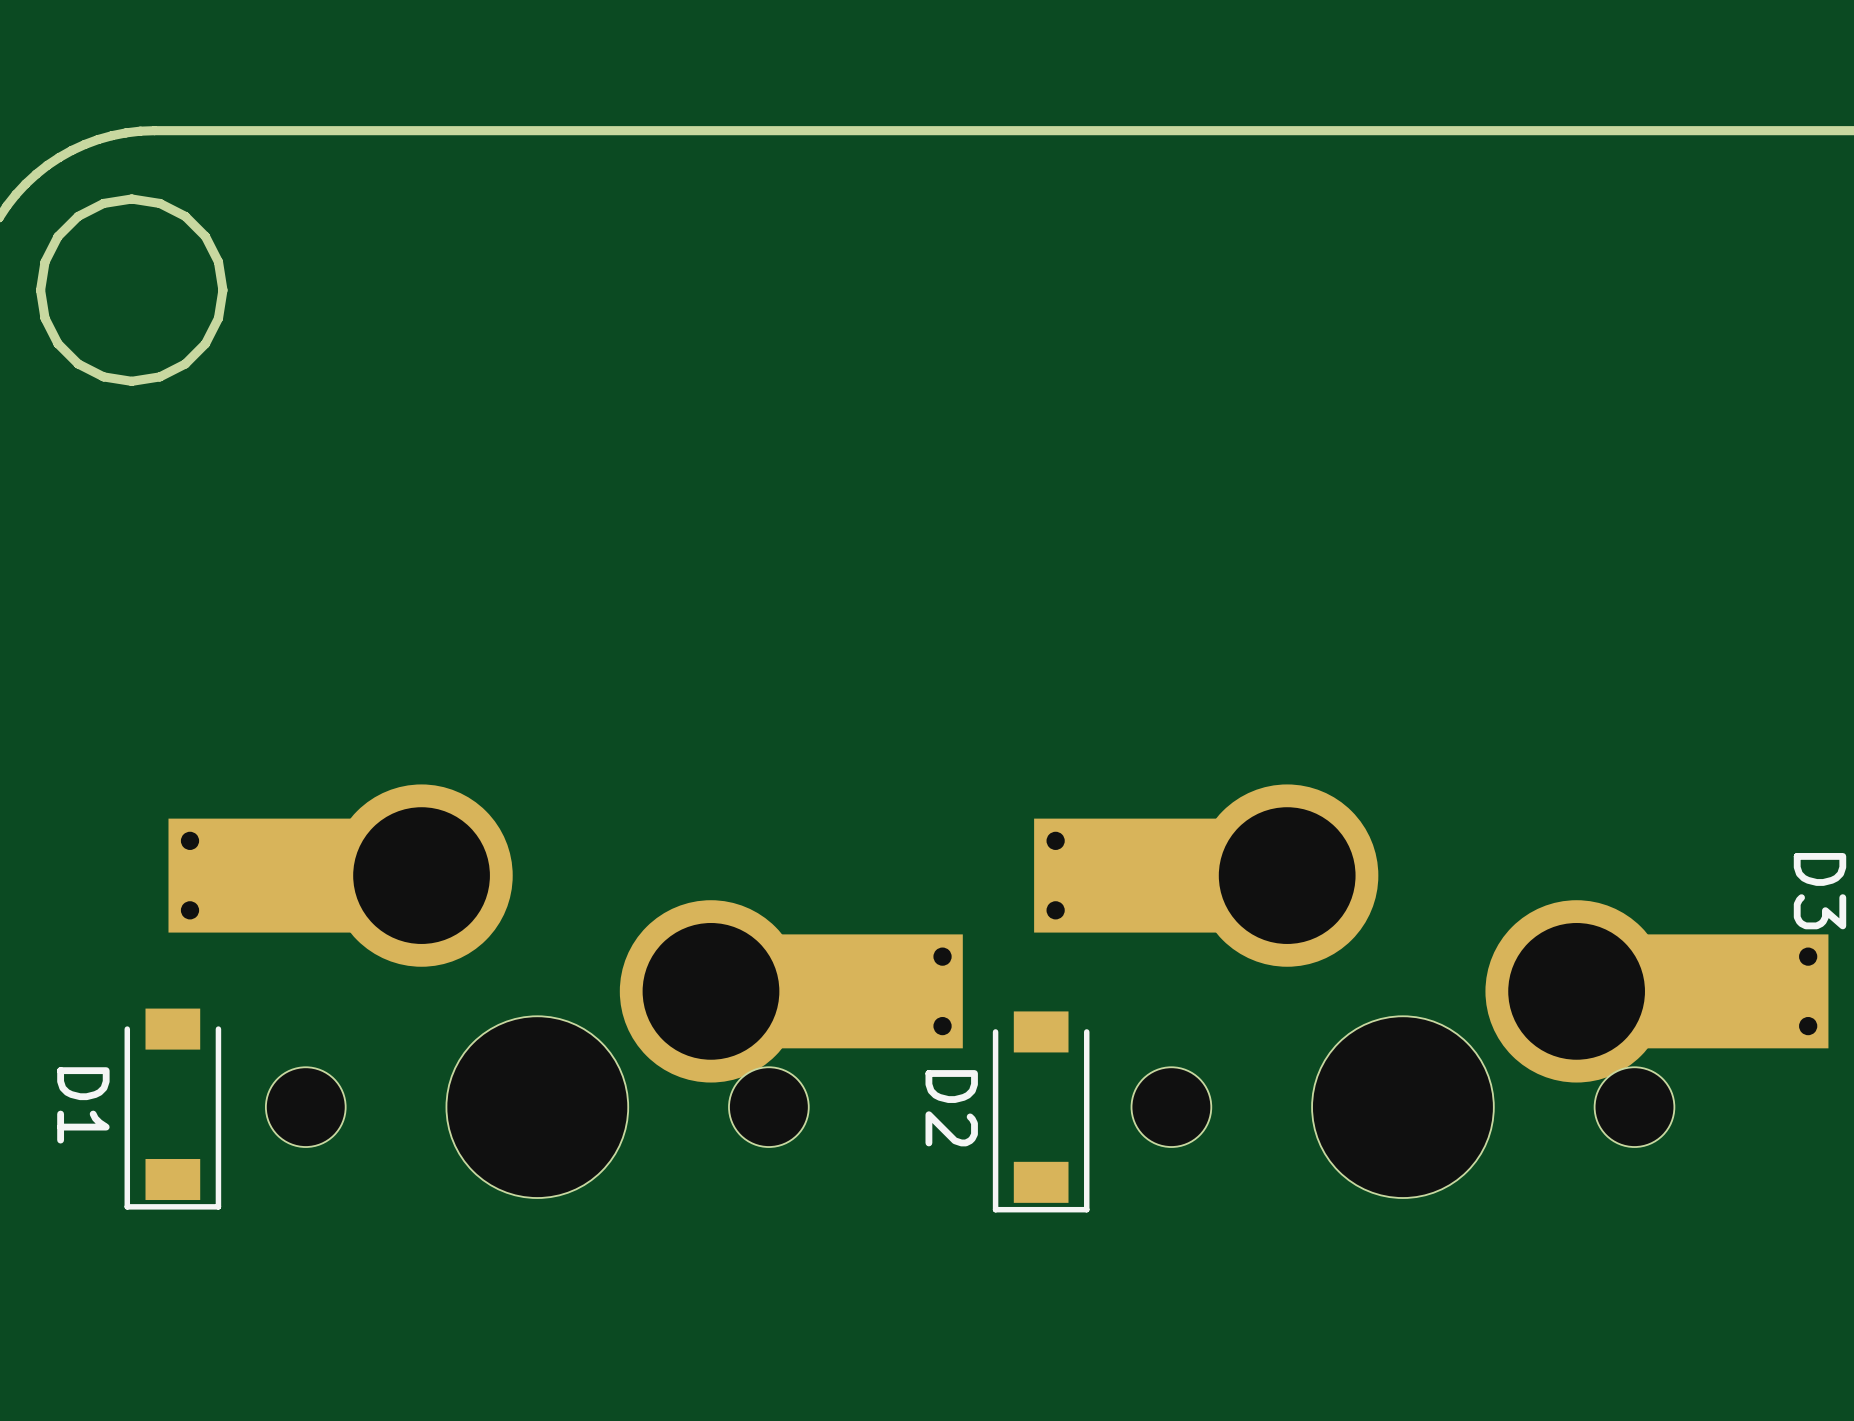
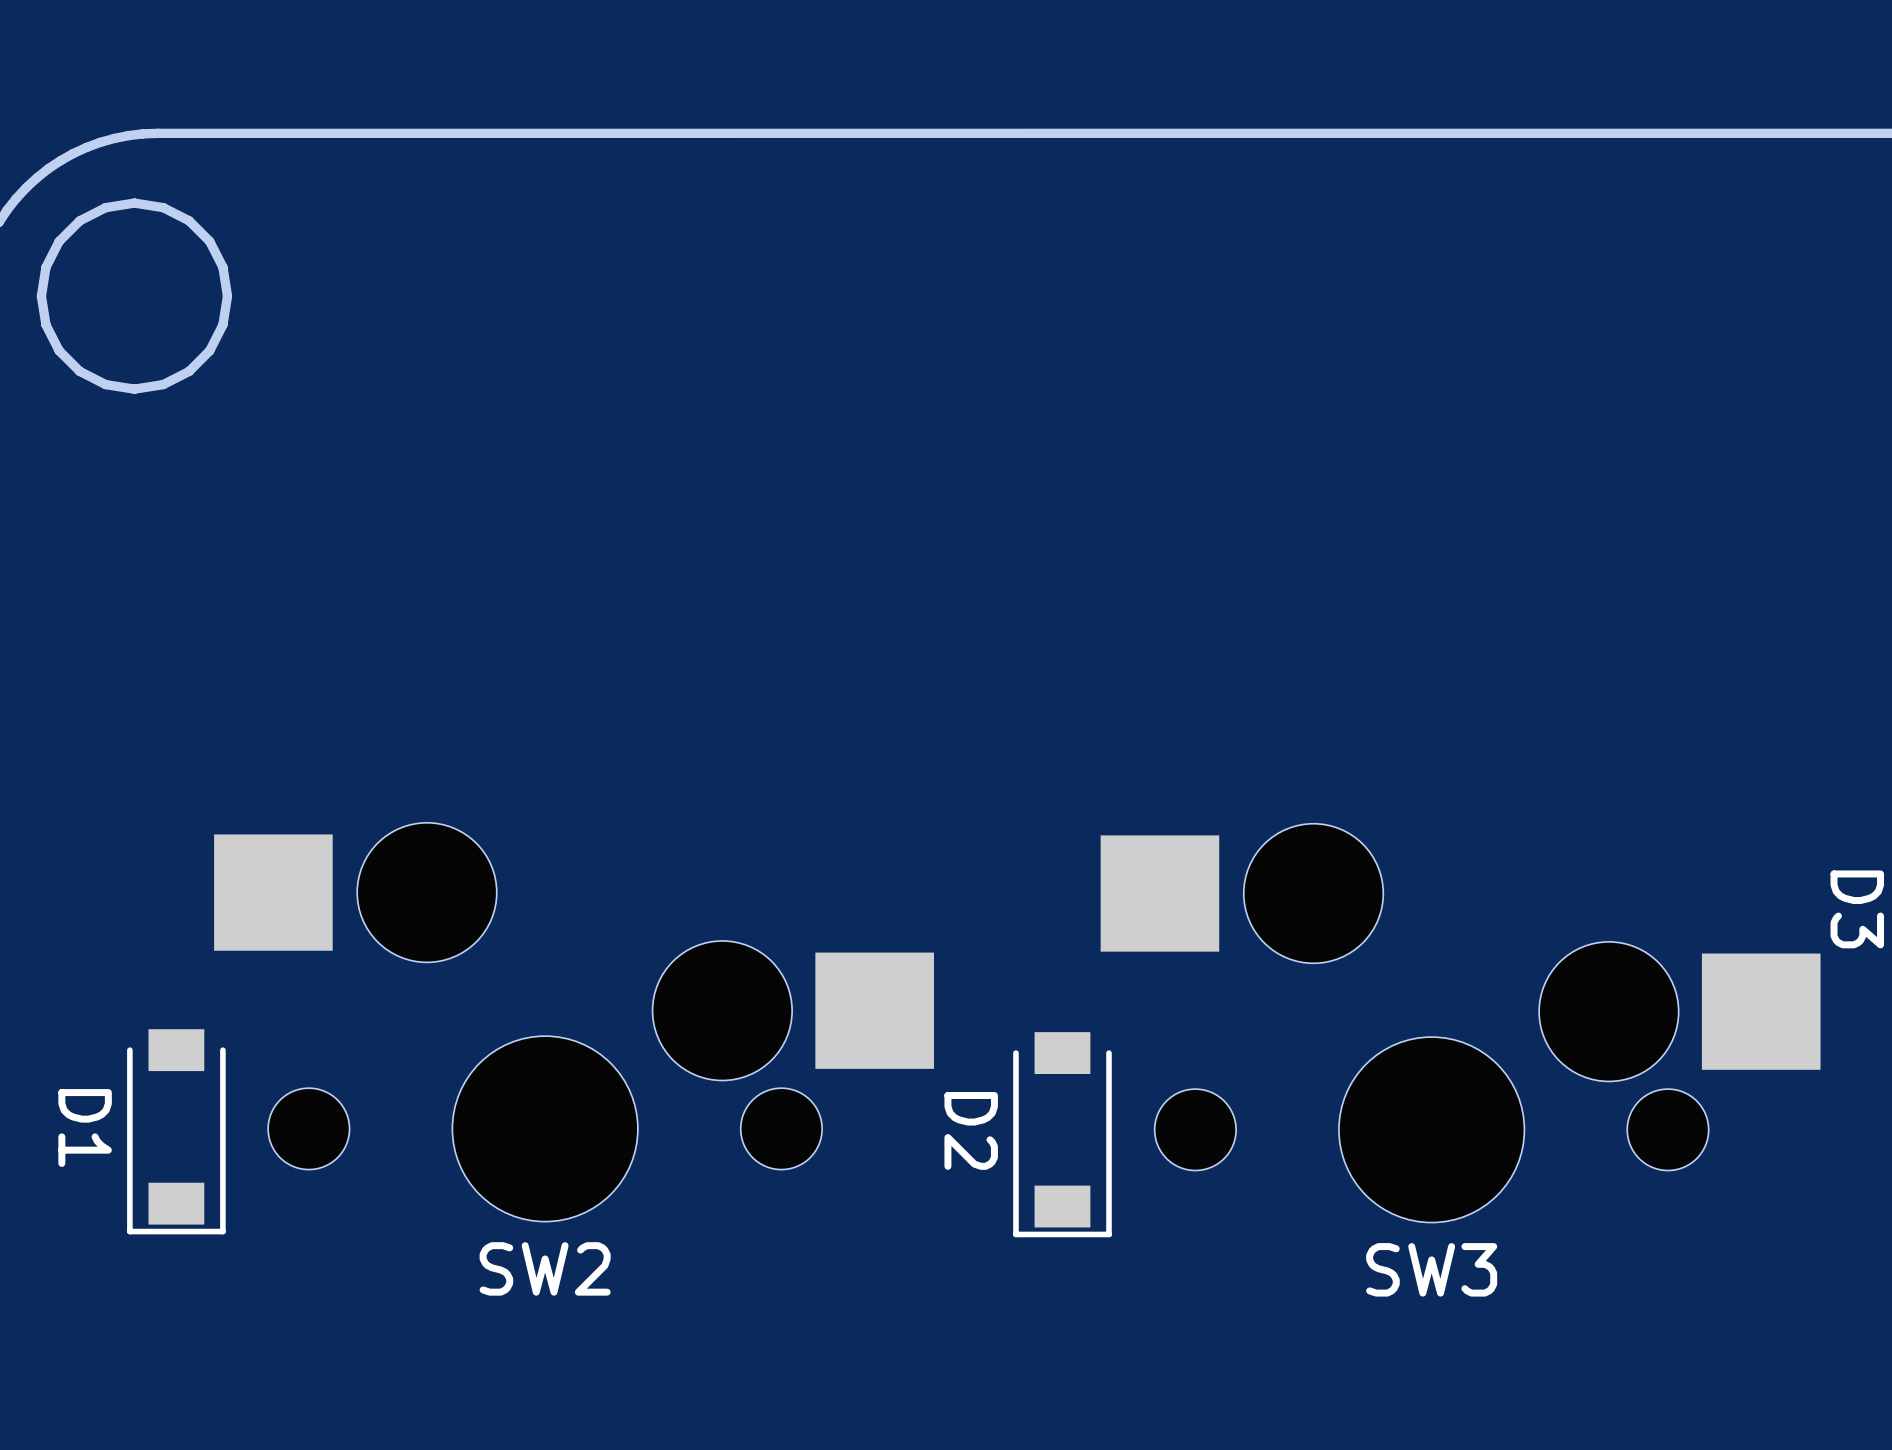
part: (565, 991) -> none
part: (1431, 991) -> none
SW2: none -> (574, 1022)
SW3: none -> (1460, 1023)

